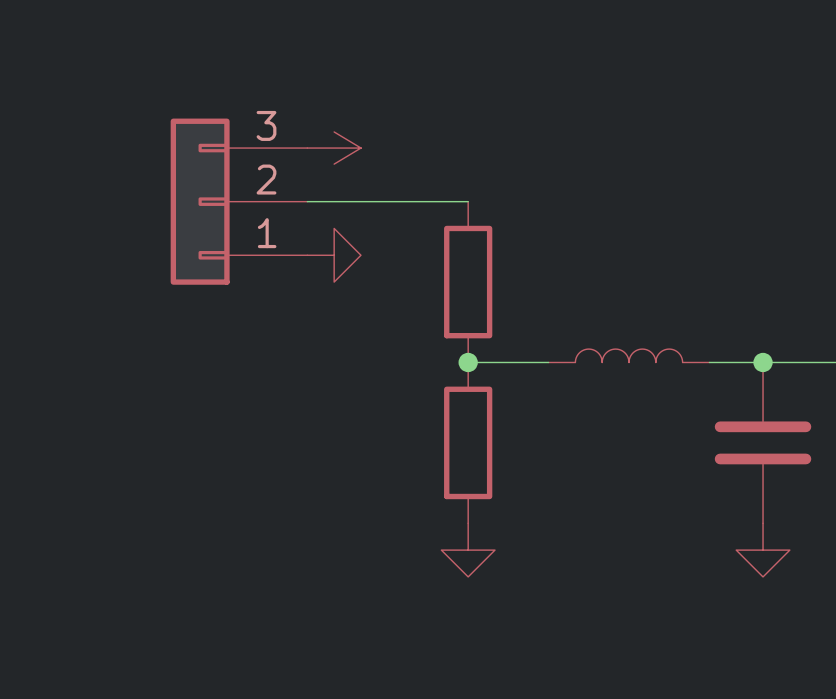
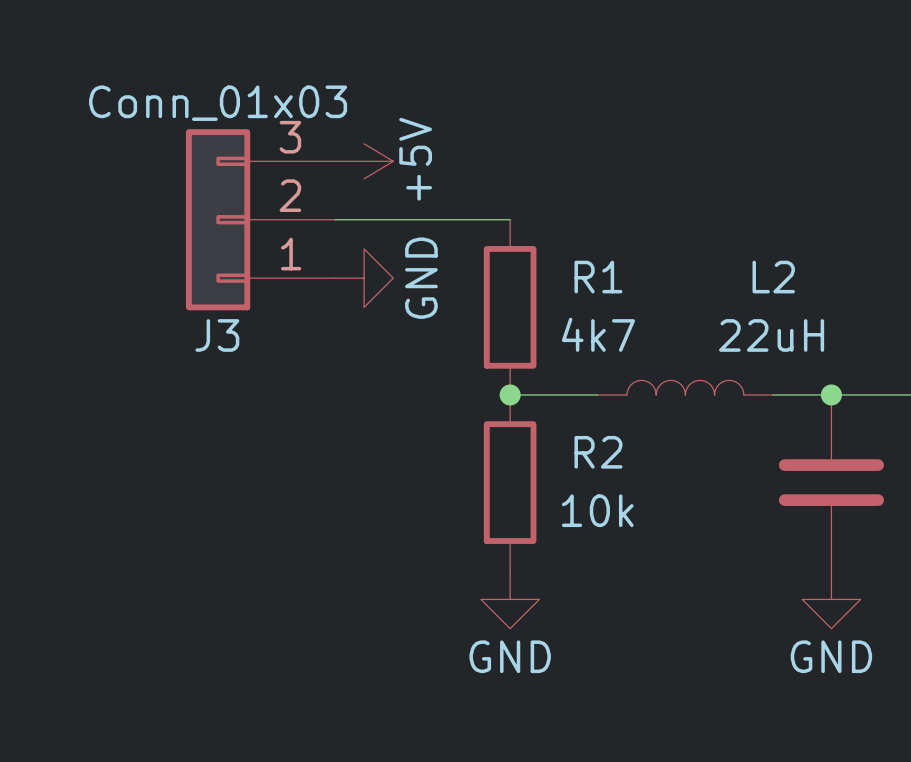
J3 value: none -> Conn_01x03 (218, 103)
power symbol text: none -> +5V (415, 159)
R1 name: none -> R1 (598, 277)
power symbol text: none -> GND (421, 278)
J3 name: none -> J3 (217, 335)
R1 value: none -> 4k7 (598, 334)
L2: none -> 22uH (685, 387)
R2 name: none -> R2 (598, 452)
R2 value: none -> 10k (597, 510)
power symbol text: none -> GND (510, 656)
power symbol text: none -> GND (831, 656)

